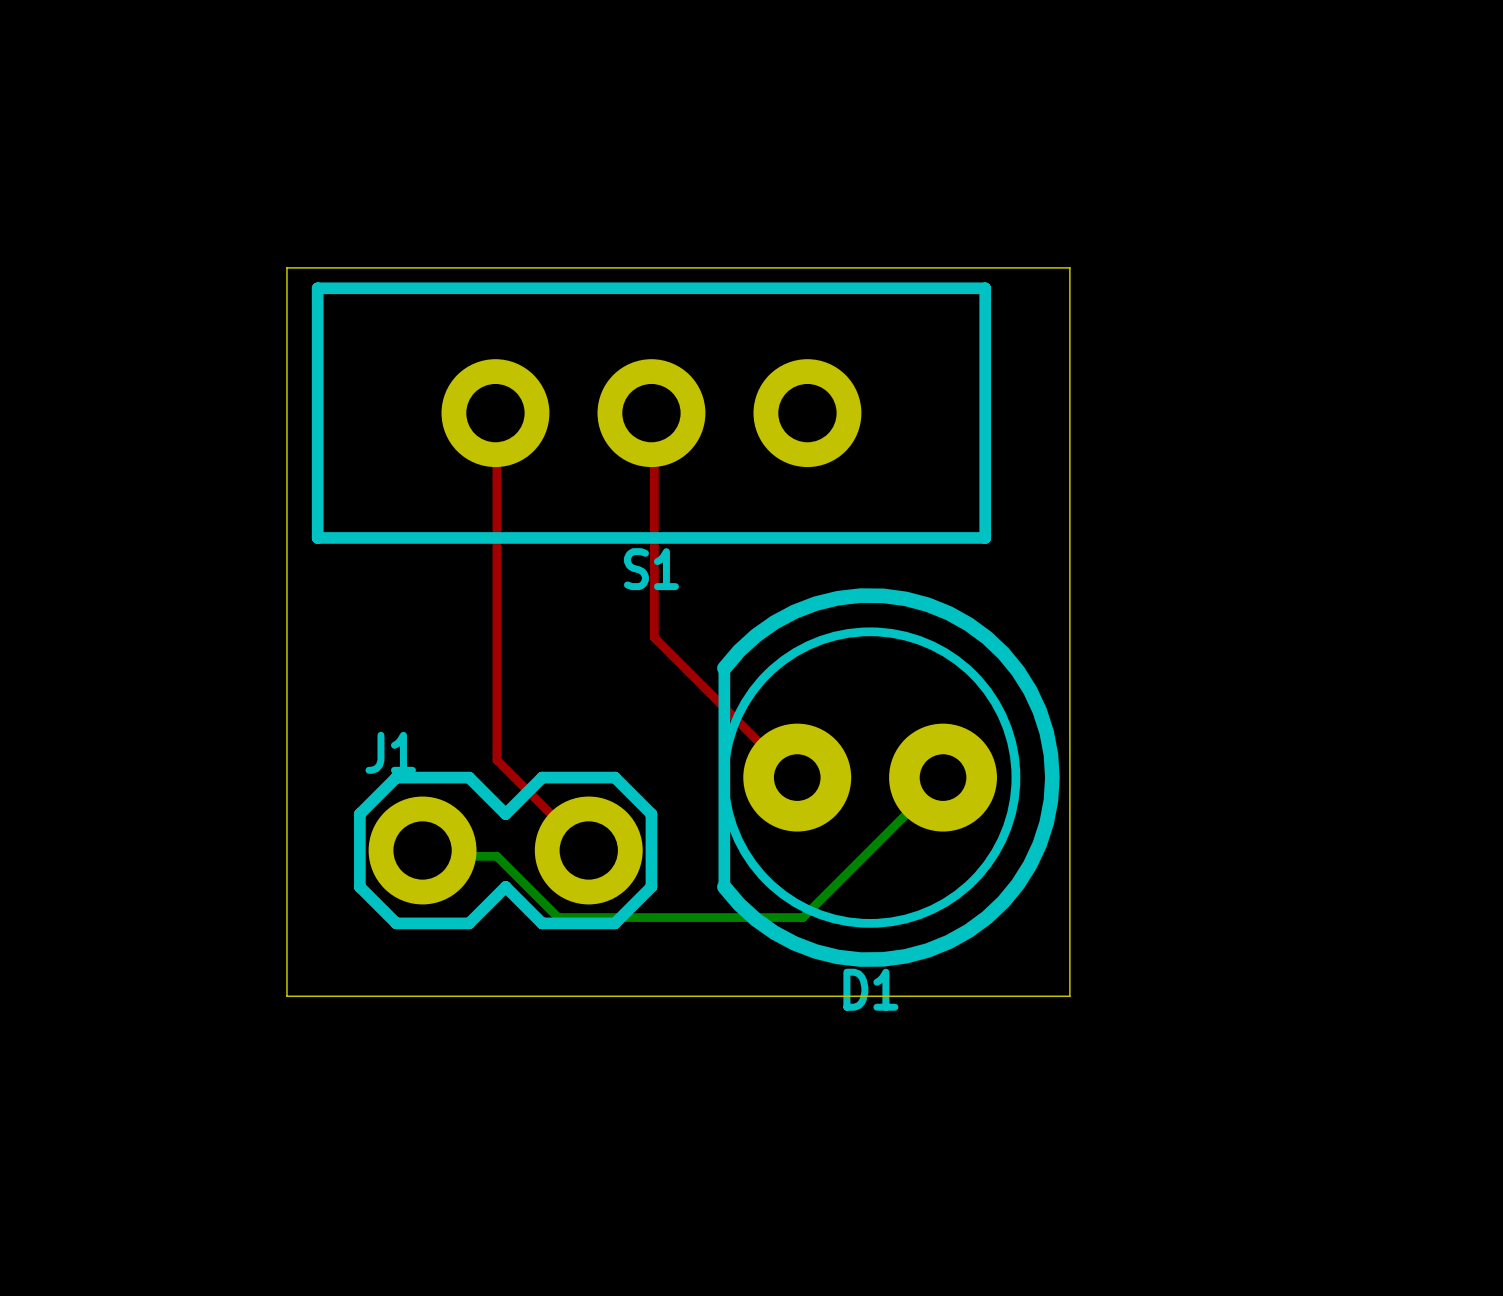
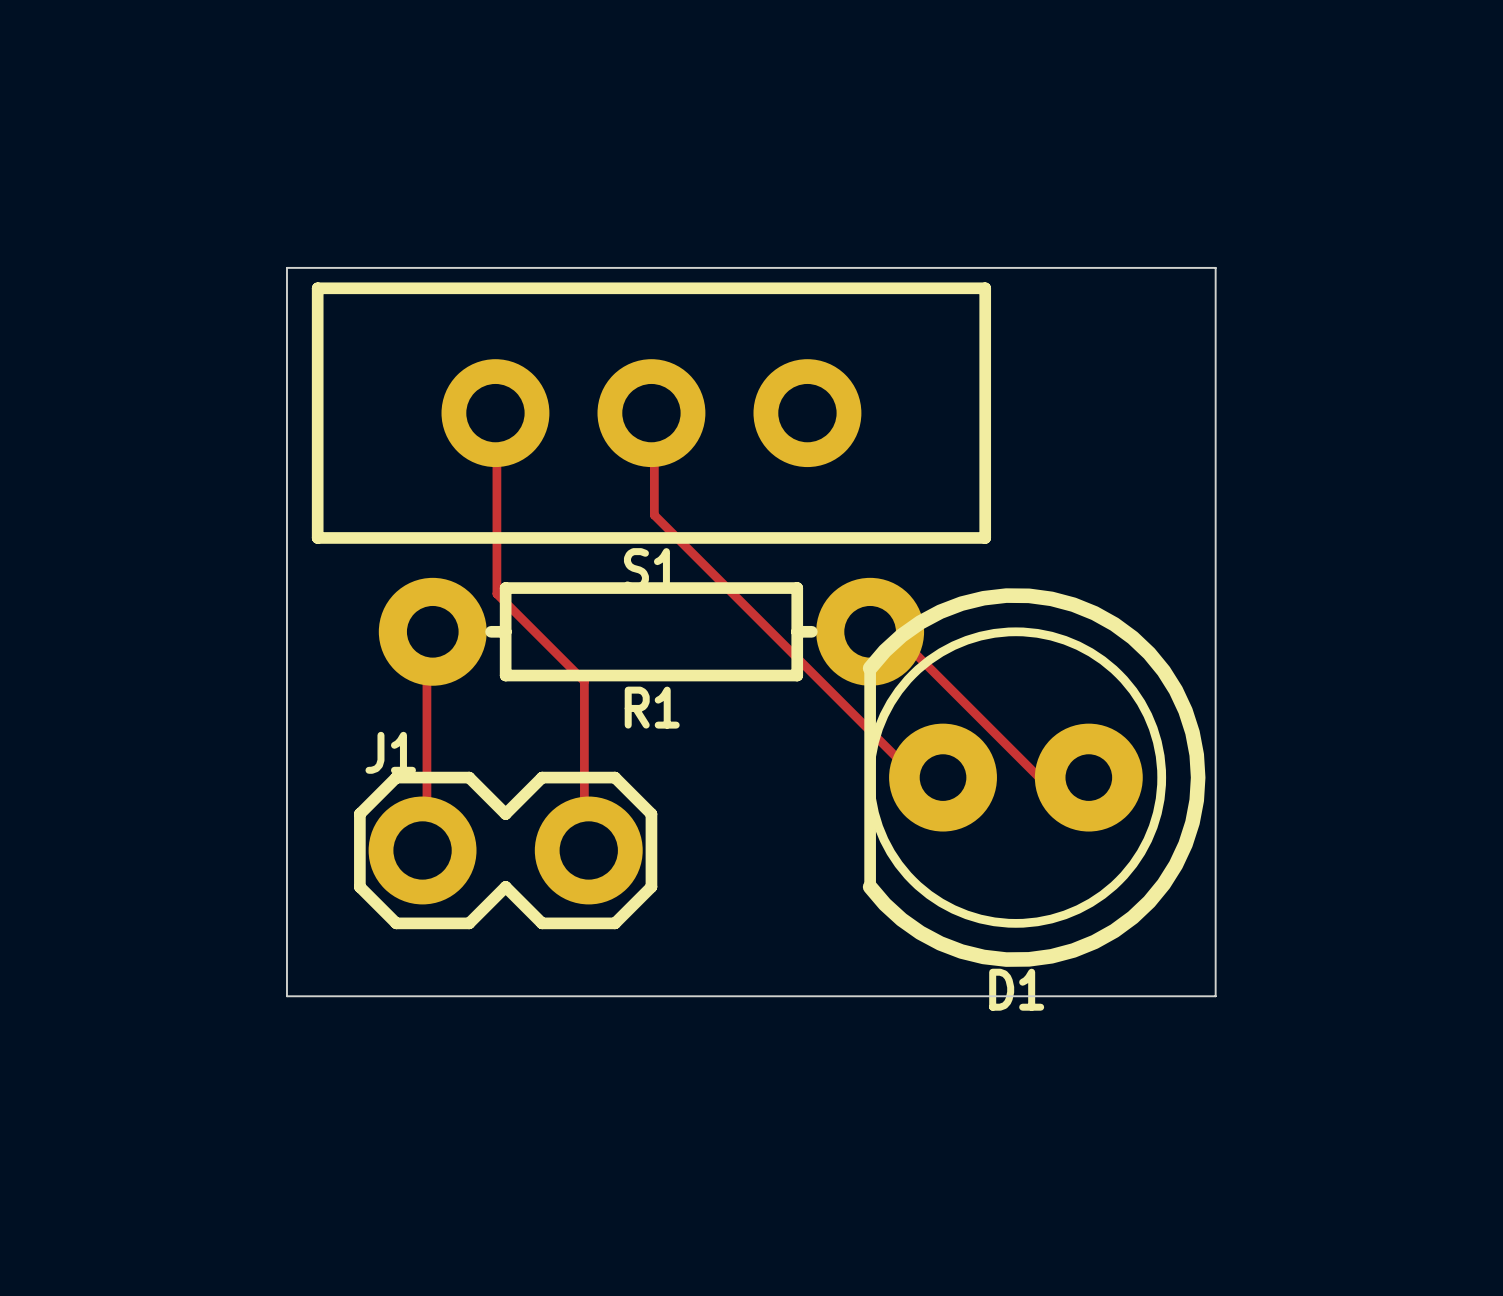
board edge: (1069, 267) (1069, 996) -> (1069, 267) (1215, 267) (1215, 996) (1069, 996)
top track: (654, 515) (654, 637) (794, 777) (797, 777) -> (654, 515) (916, 777) (943, 777)
top track: (496, 593) (496, 760) (584, 847) -> (496, 593) (584, 681) (584, 847)
top track: none -> (432, 631) (426, 637) (426, 847) (422, 850)
R1: none -> (651, 631)
top track: none -> (870, 631) (873, 637) (899, 637) (1039, 777) (1088, 777)
D1 position: (888, 777) -> (1034, 777)
bottom track: (943, 777) (803, 917) (558, 917) (496, 856) (426, 856) -> none

